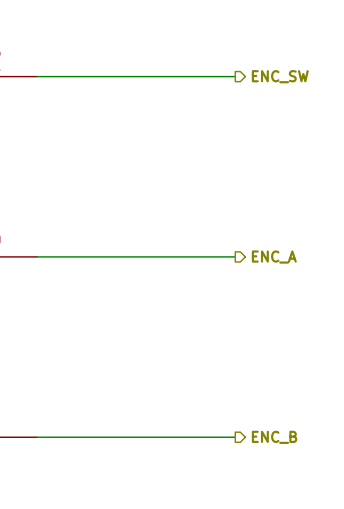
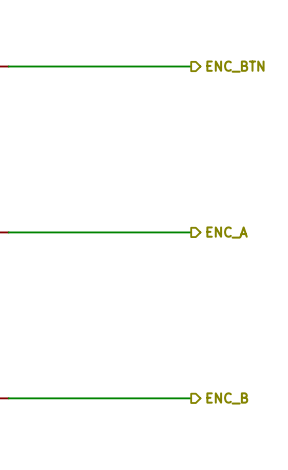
hierarchical label: ENC_SW (280, 76) -> ENC_BTN (235, 66)

